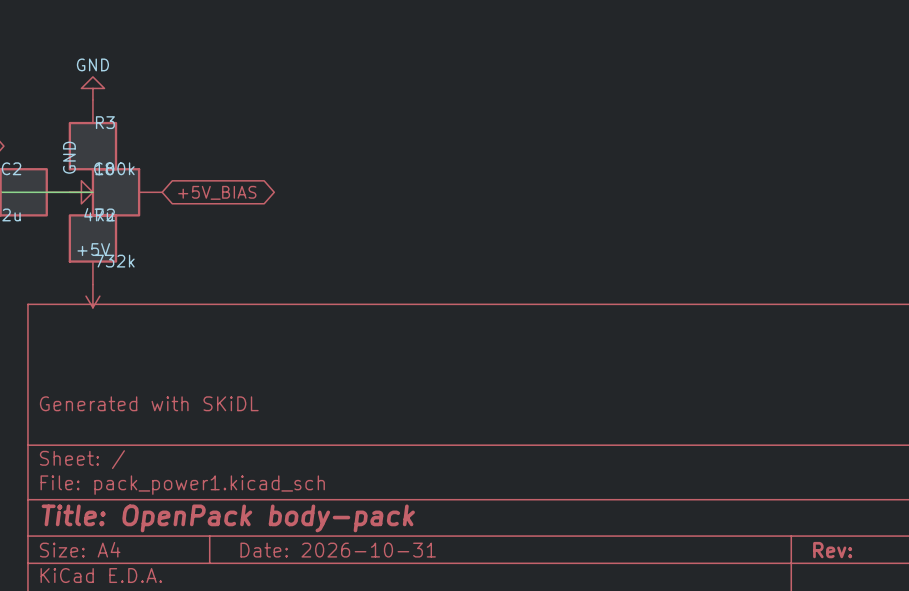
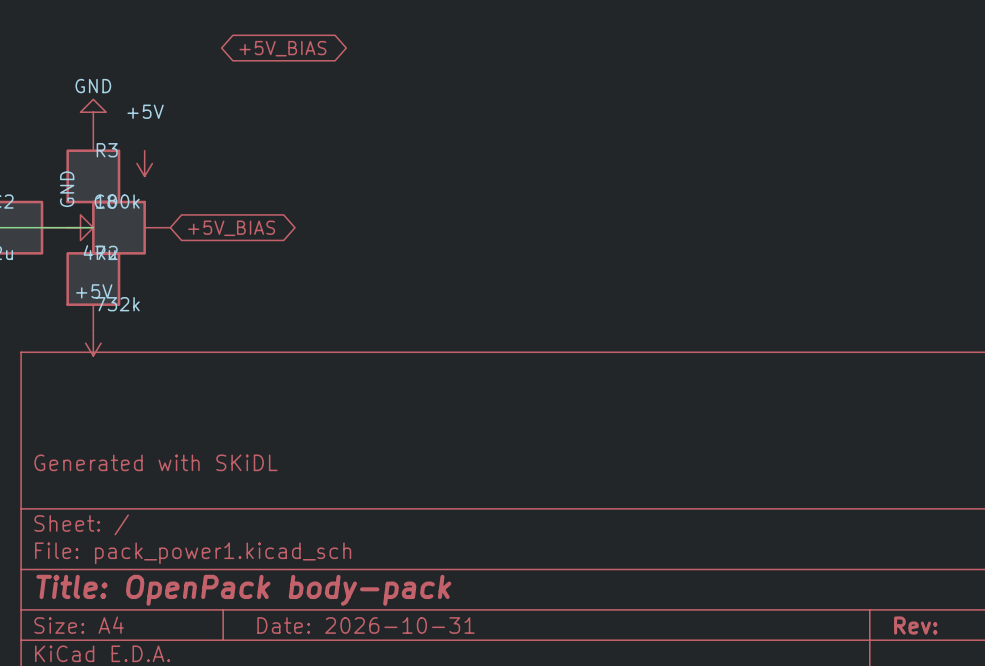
global label: none -> +5V_BIAS (282, 48)
power symbol: none -> +5V (144, 163)

